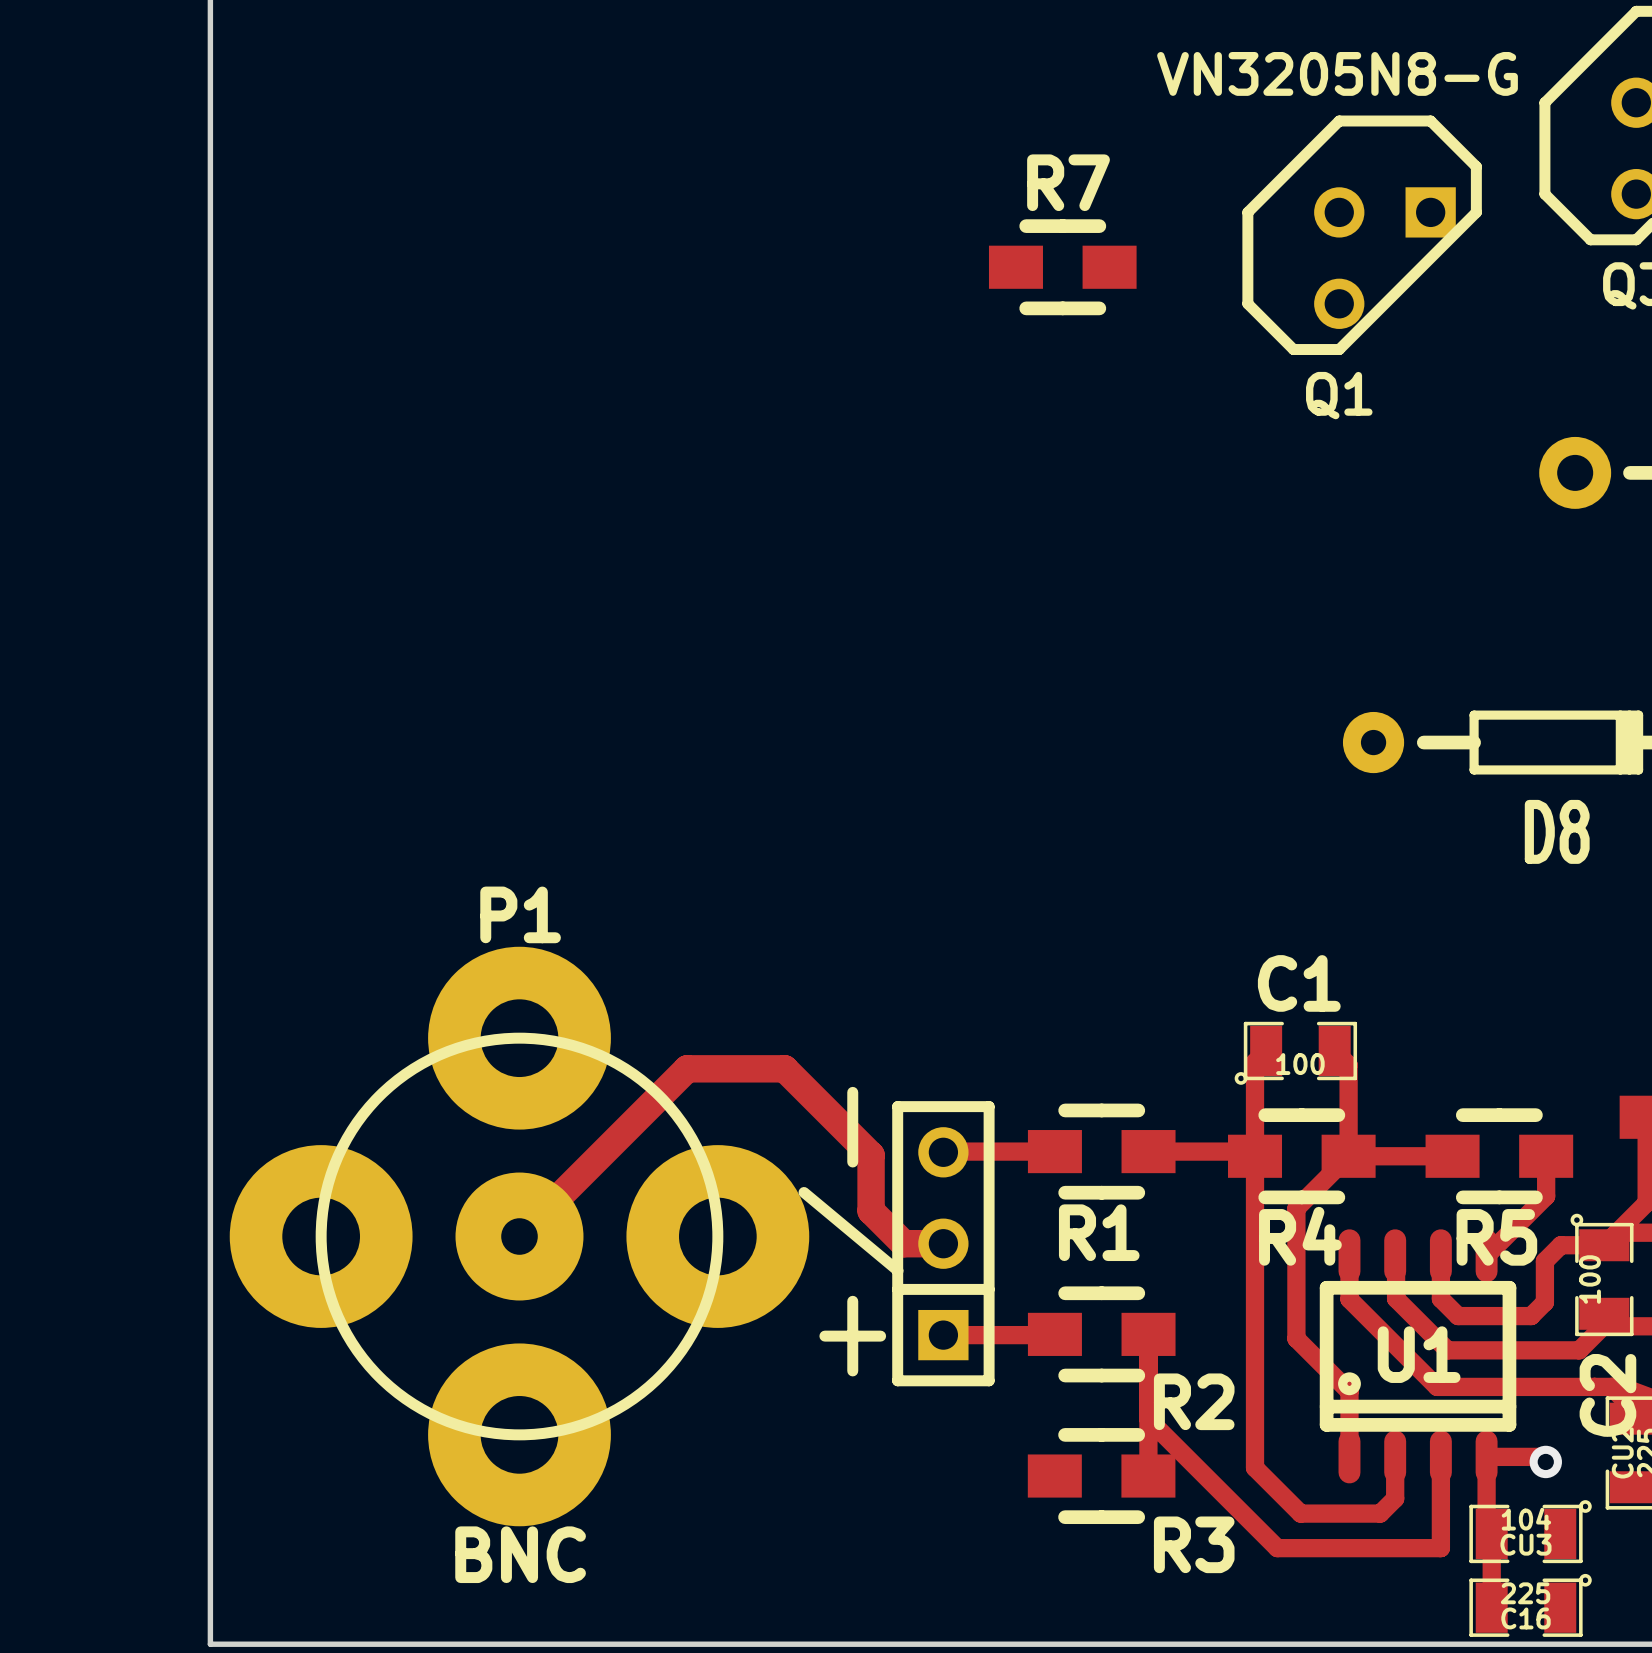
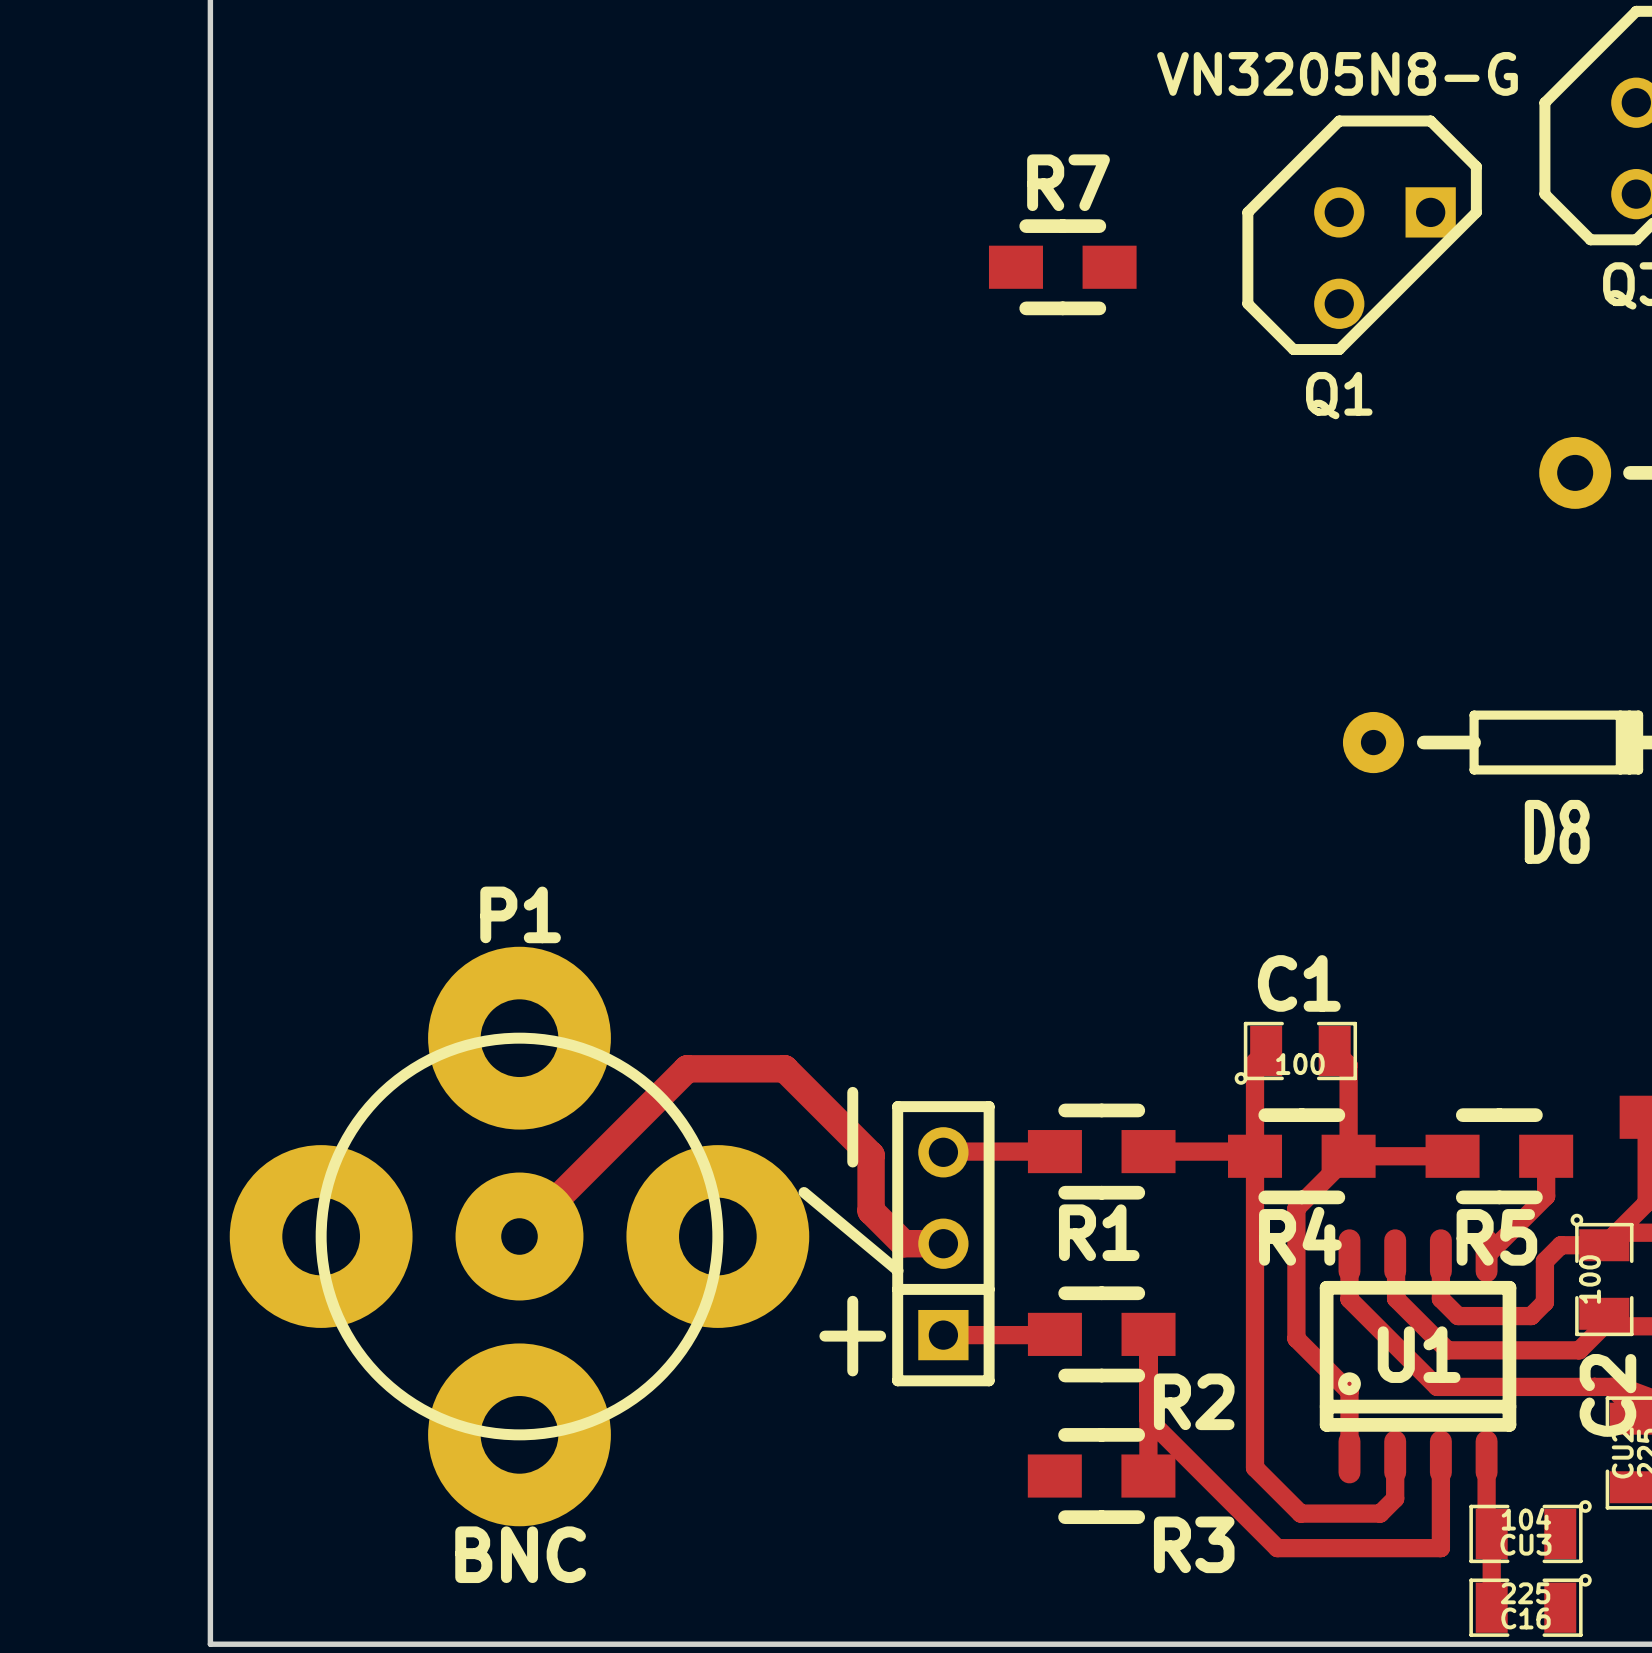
track: (1486, 1456) (1540, 1456) (1545, 1461) -> none
via: (1545, 1461) -> none

